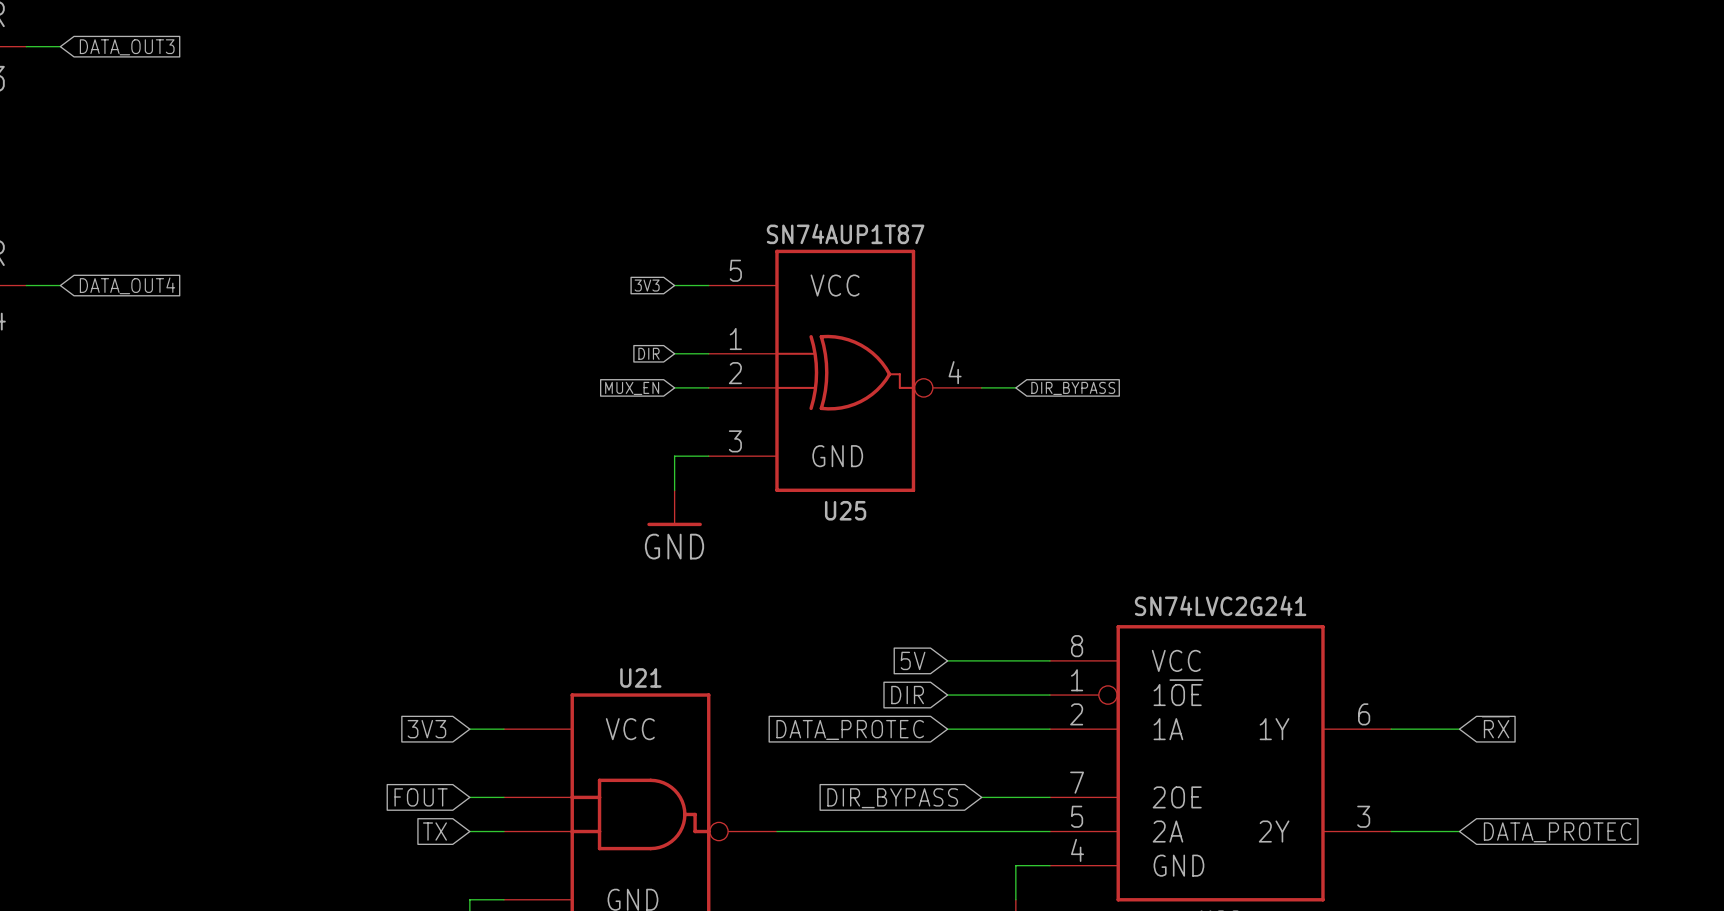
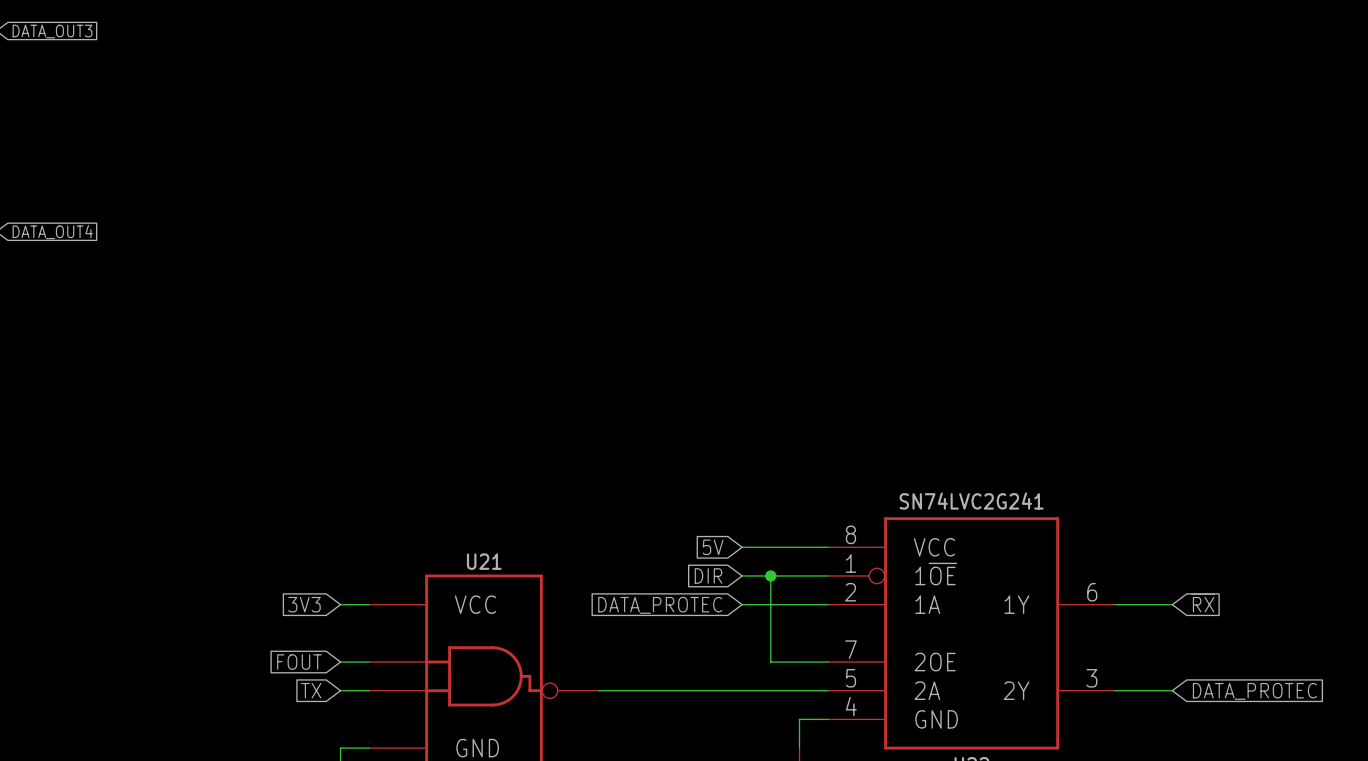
global label: 3V3 (647, 285) -> none
wire: (674, 285) (708, 285) -> none
global label: DIR (649, 353) -> none
wire: (674, 353) (708, 353) -> none
U25: (845, 370) -> none
wire: (674, 387) (708, 387) -> none
wire: (981, 387) (1015, 387) -> none
global label: MUX_EN (632, 388) -> none
global label: DIR_BYPASS (1073, 388) -> none
wire: (708, 456) (674, 456) (674, 490) -> none
power symbol: GND (674, 508) -> none
wire: none -> (770, 575) (770, 662)
junction: none -> (770, 575)
global label: DIR_BYPASS (892, 798) -> none

